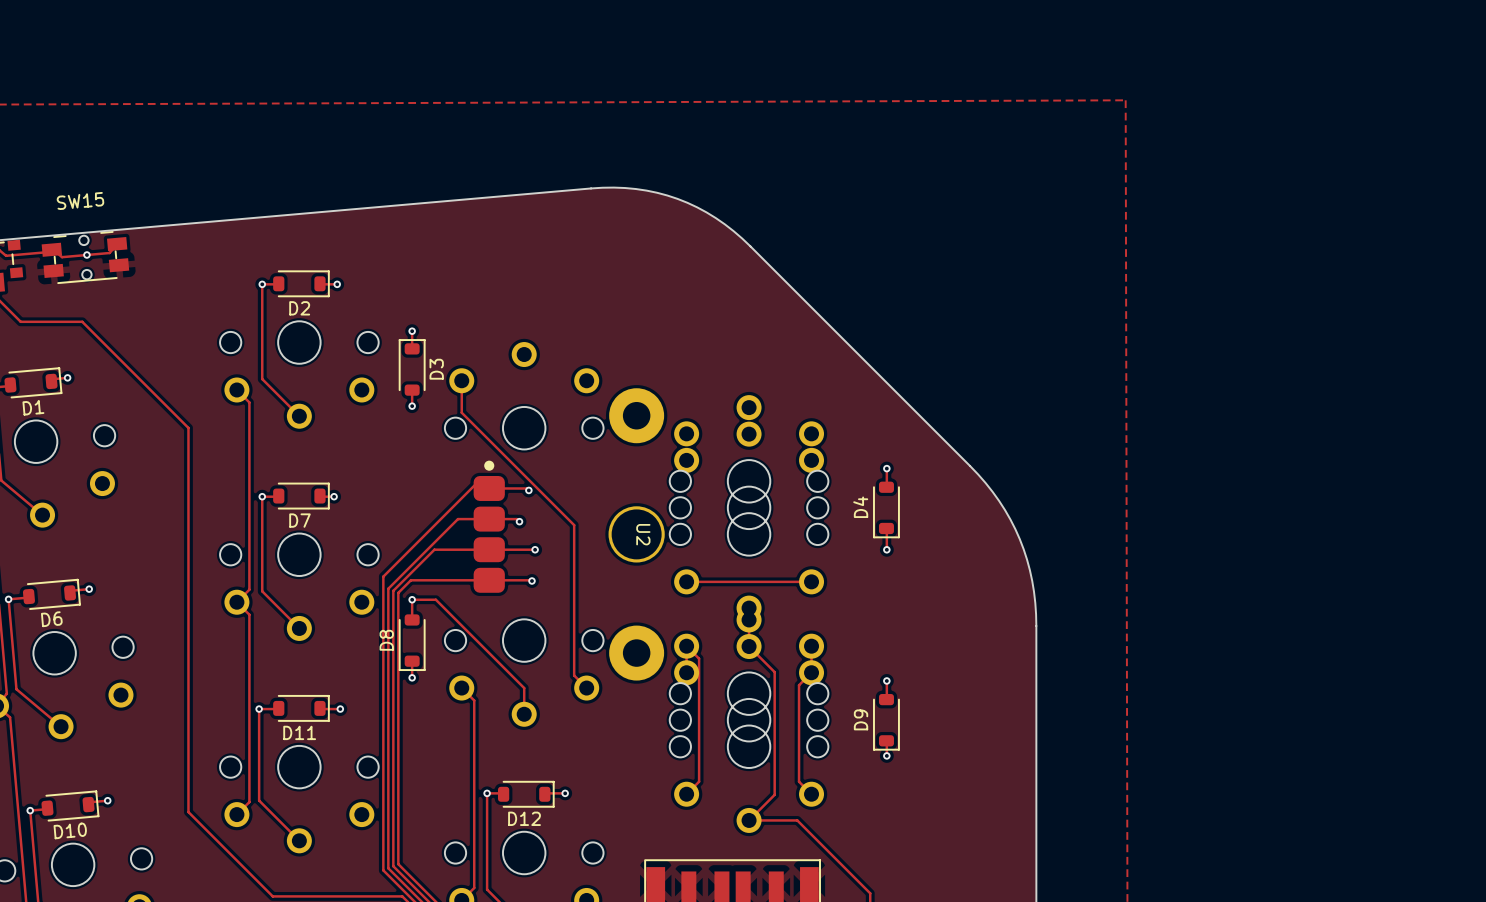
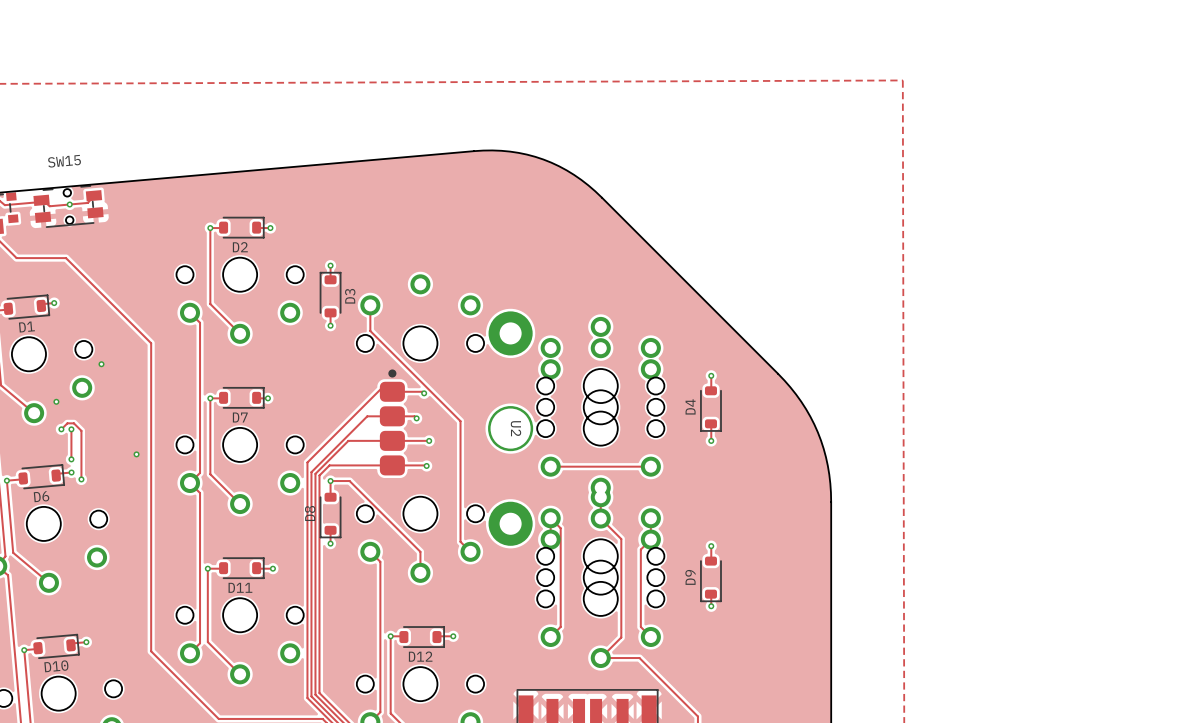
via: none -> (101, 364)
via: none -> (56, 401)
track: none -> (61, 429) (67, 423) (73, 423) (81, 430) (81, 479)
via: none -> (61, 429)
track: none -> (71, 429) (71, 459)
via: none -> (71, 429)
via: none -> (136, 454)
via: none -> (71, 459)
via: none -> (81, 479)

